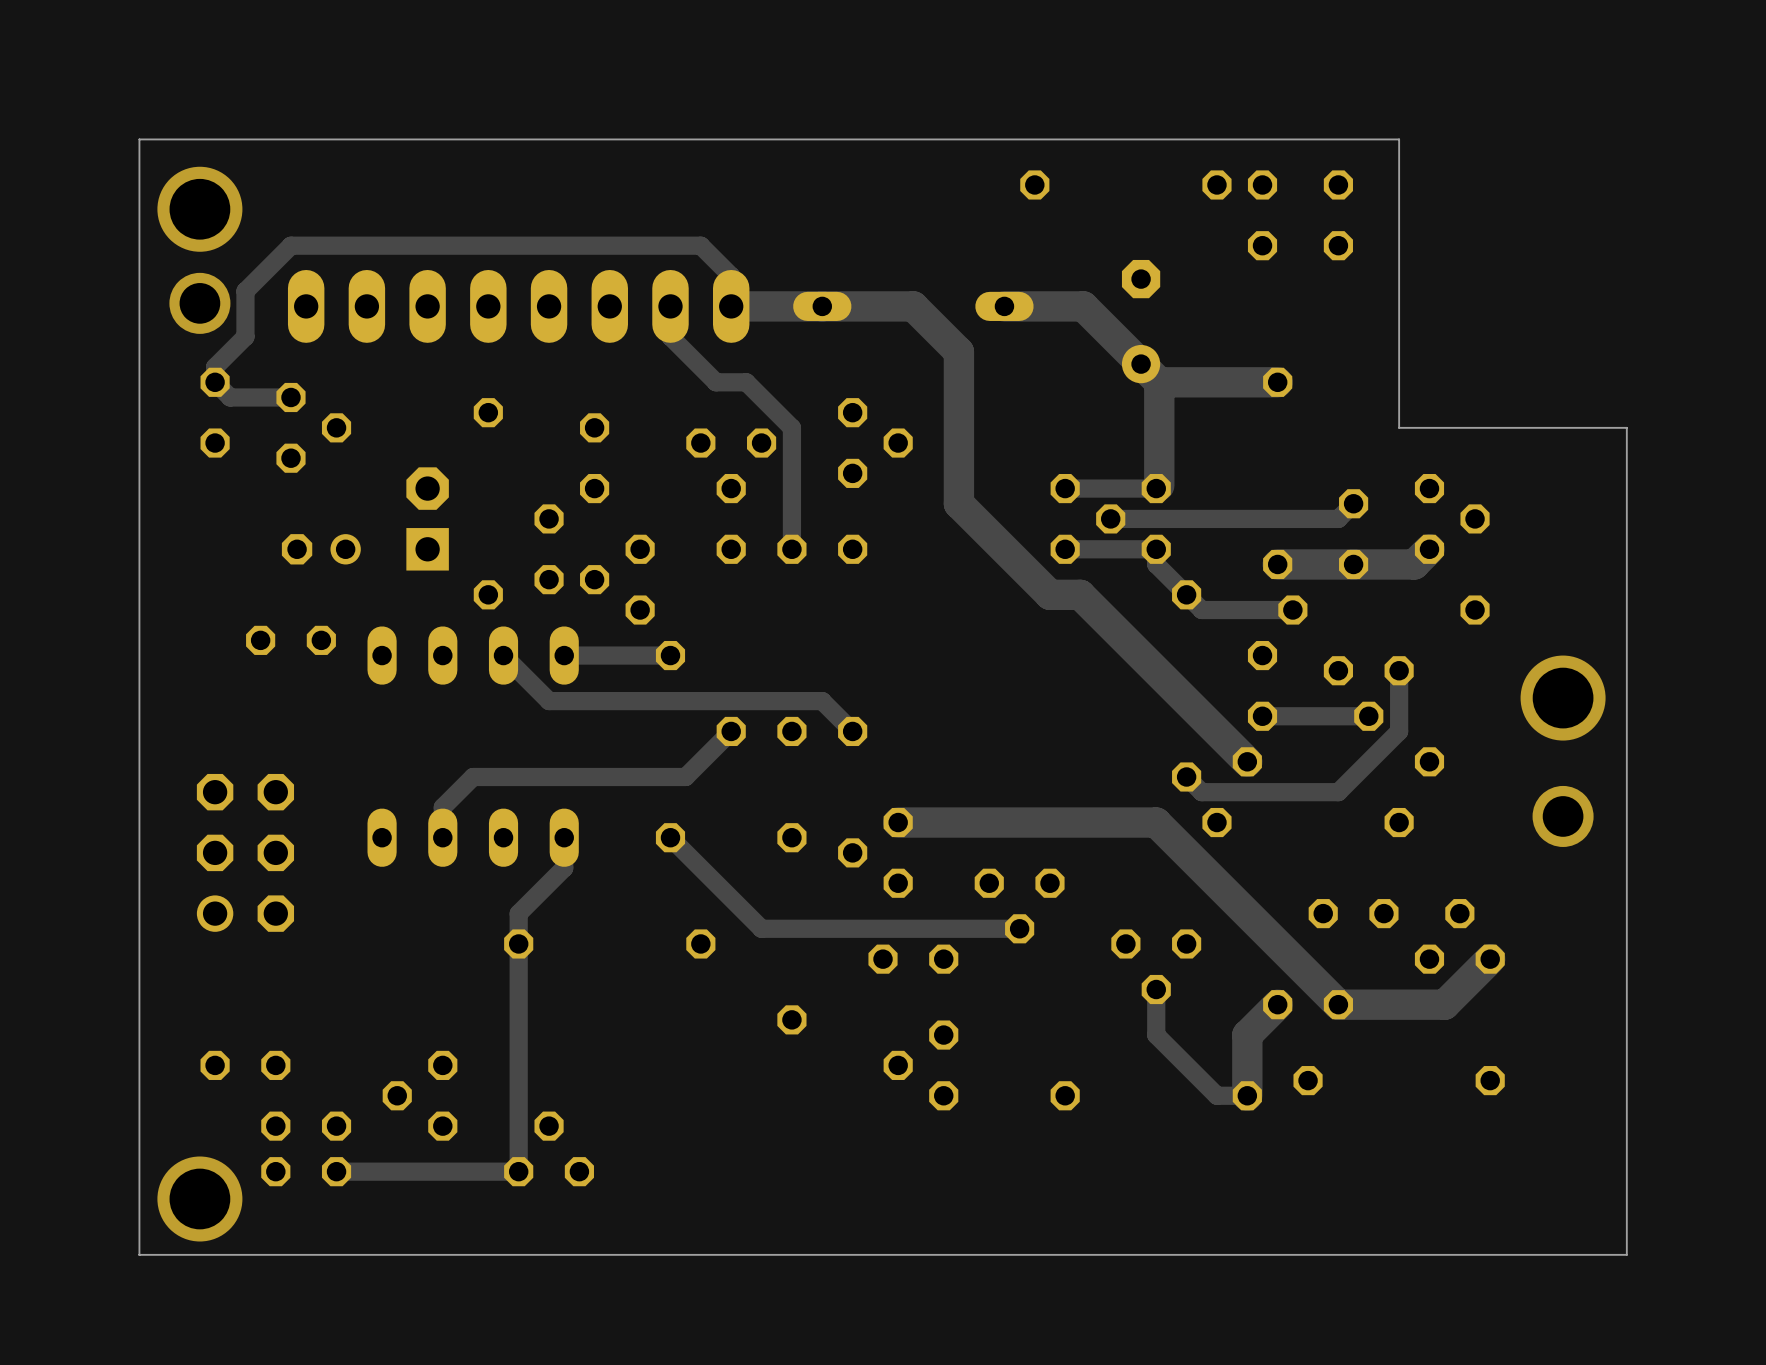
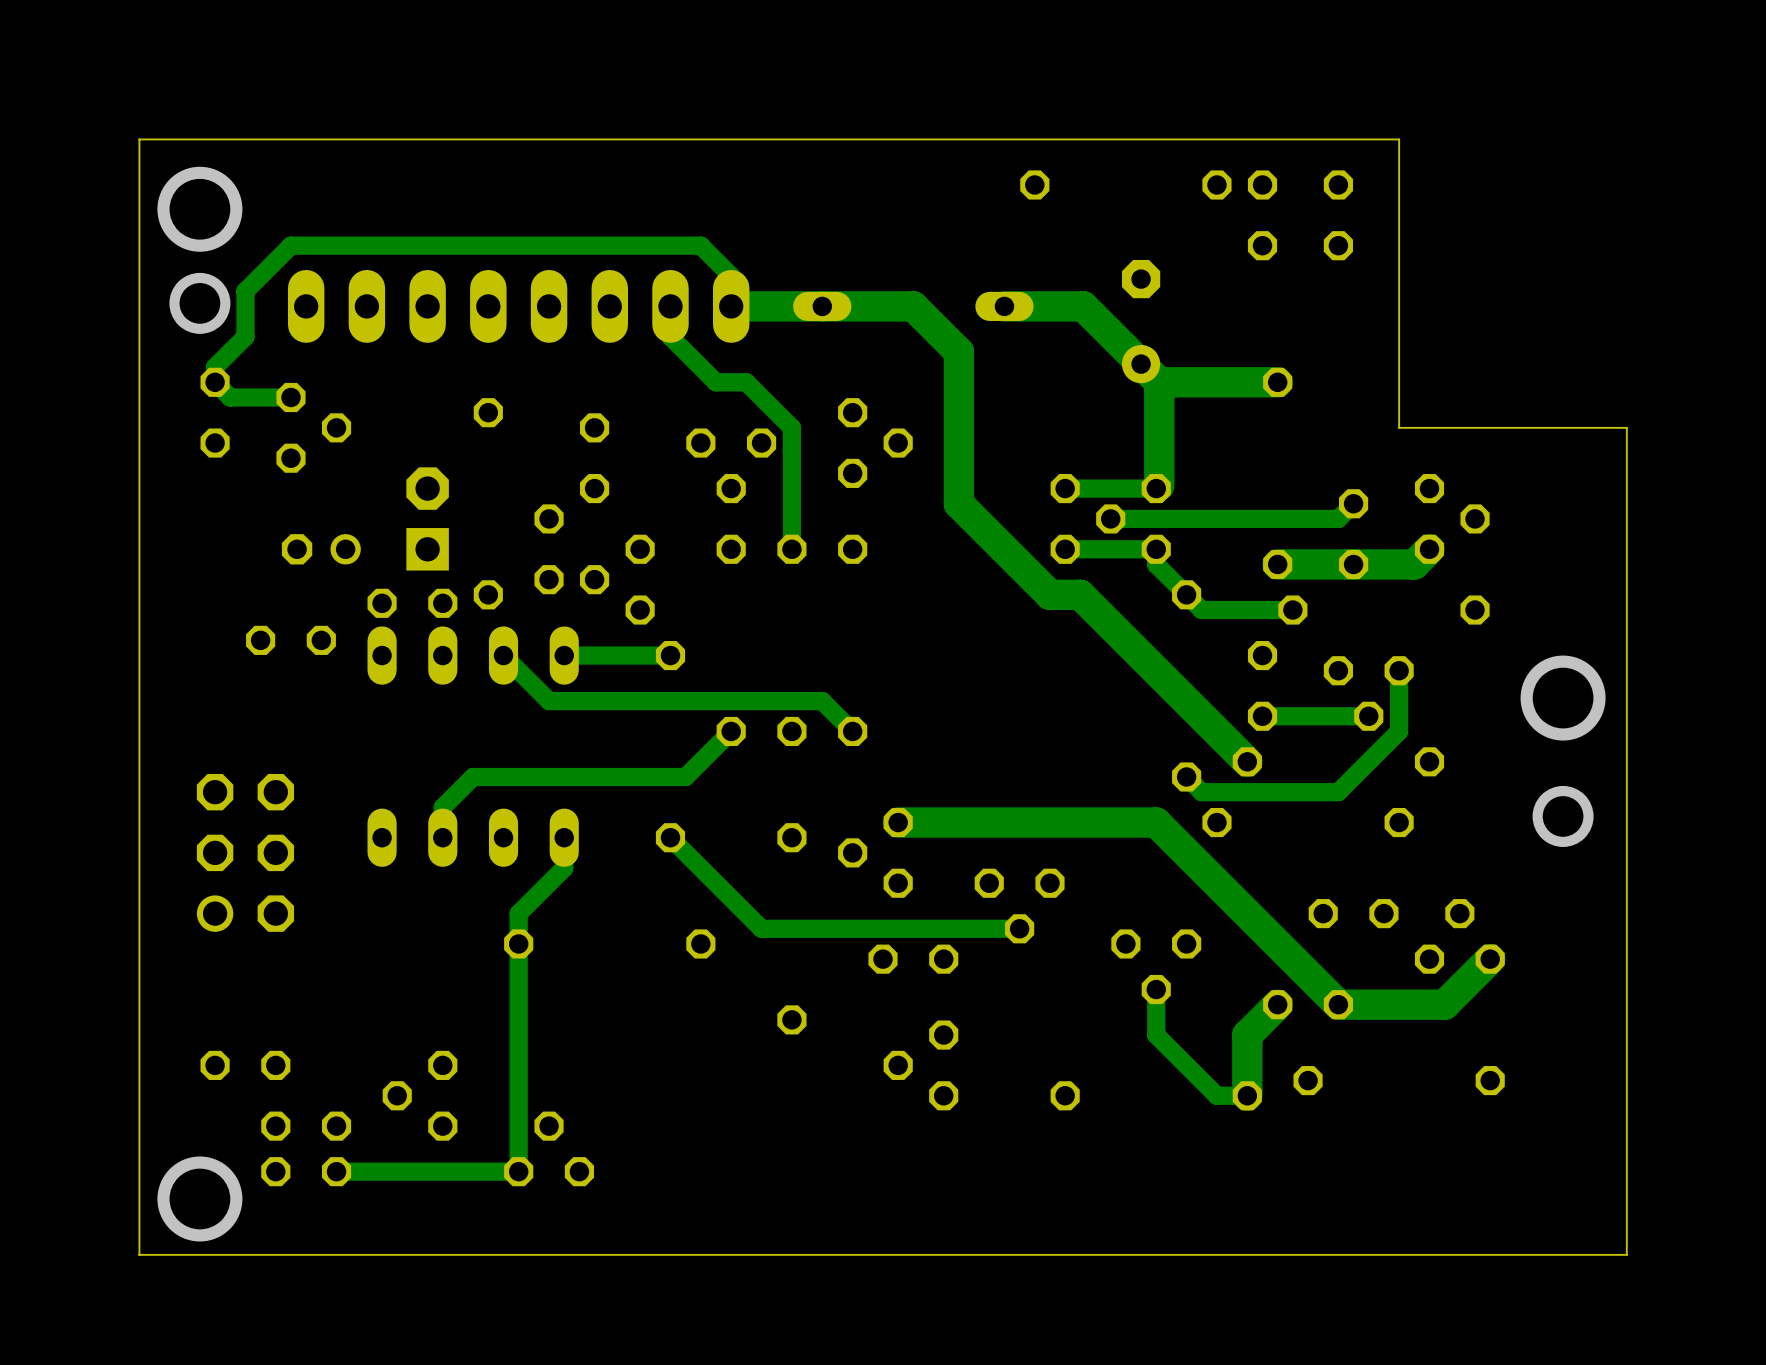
part: none -> (412, 603)

